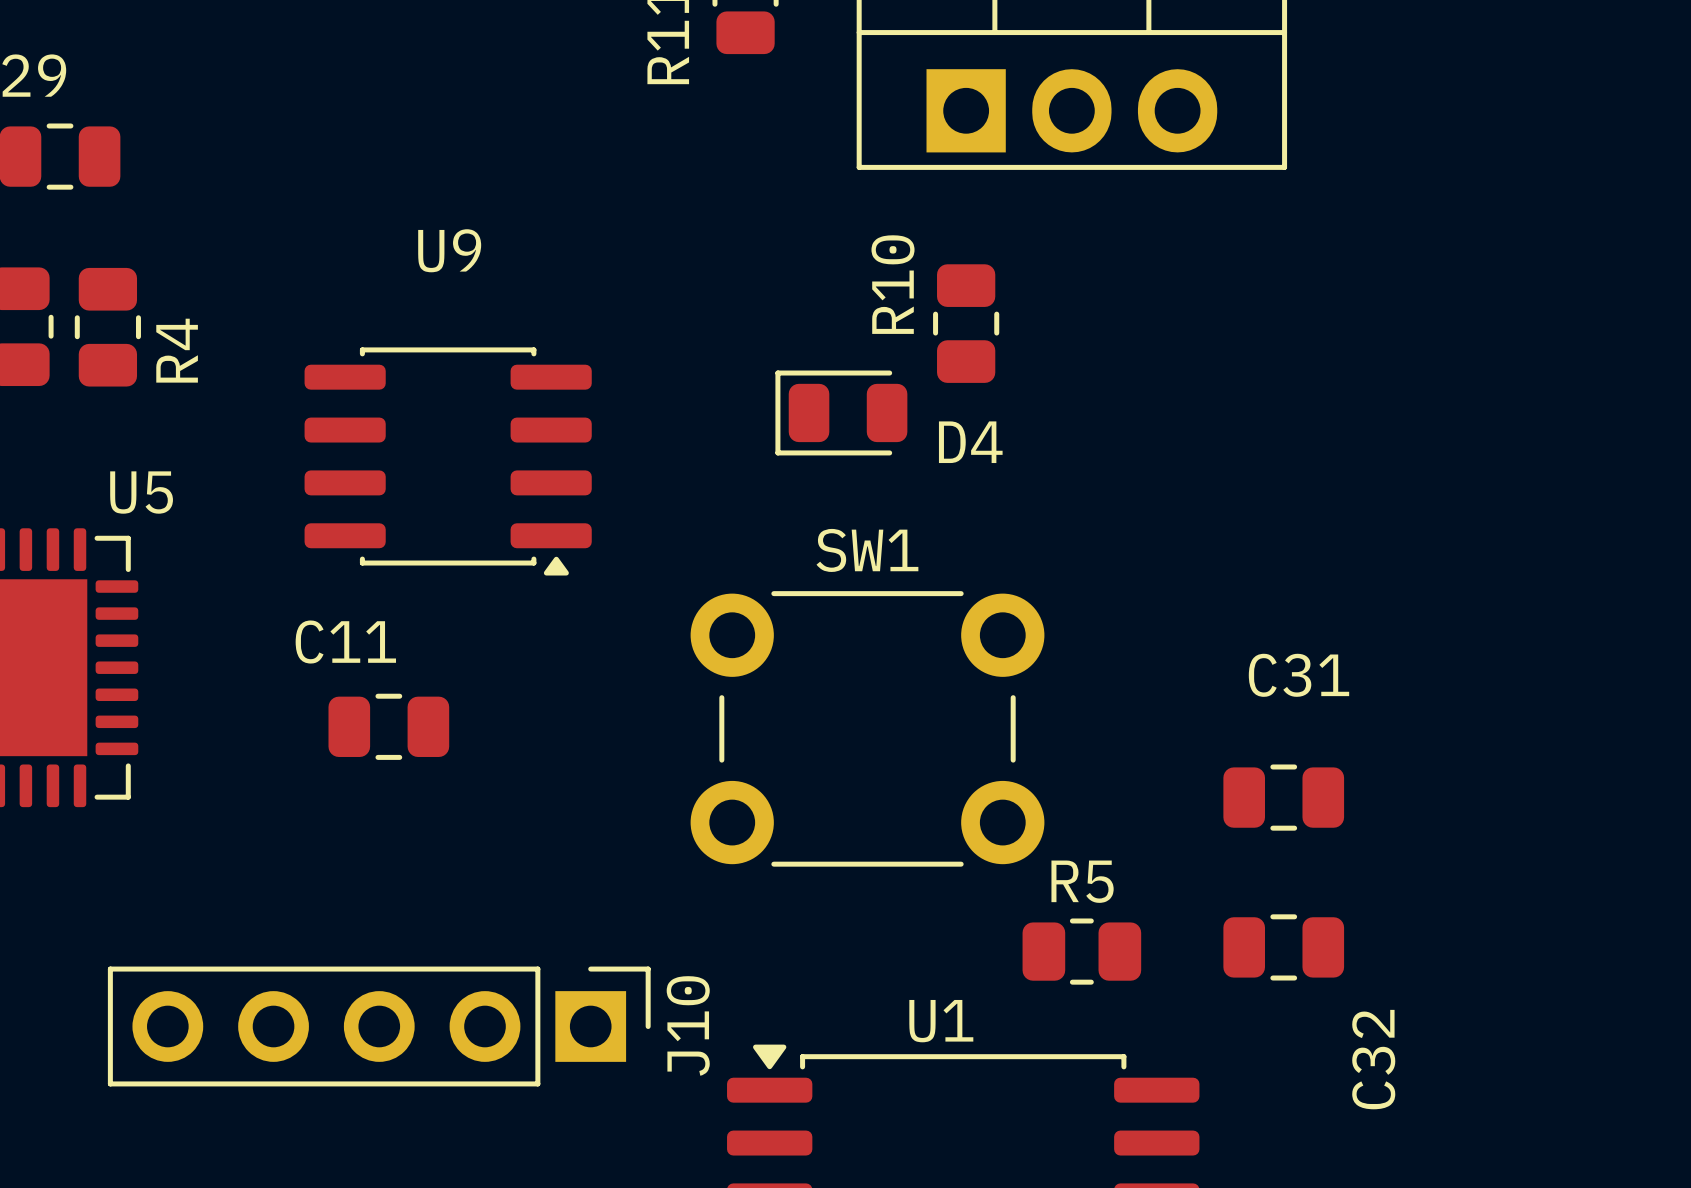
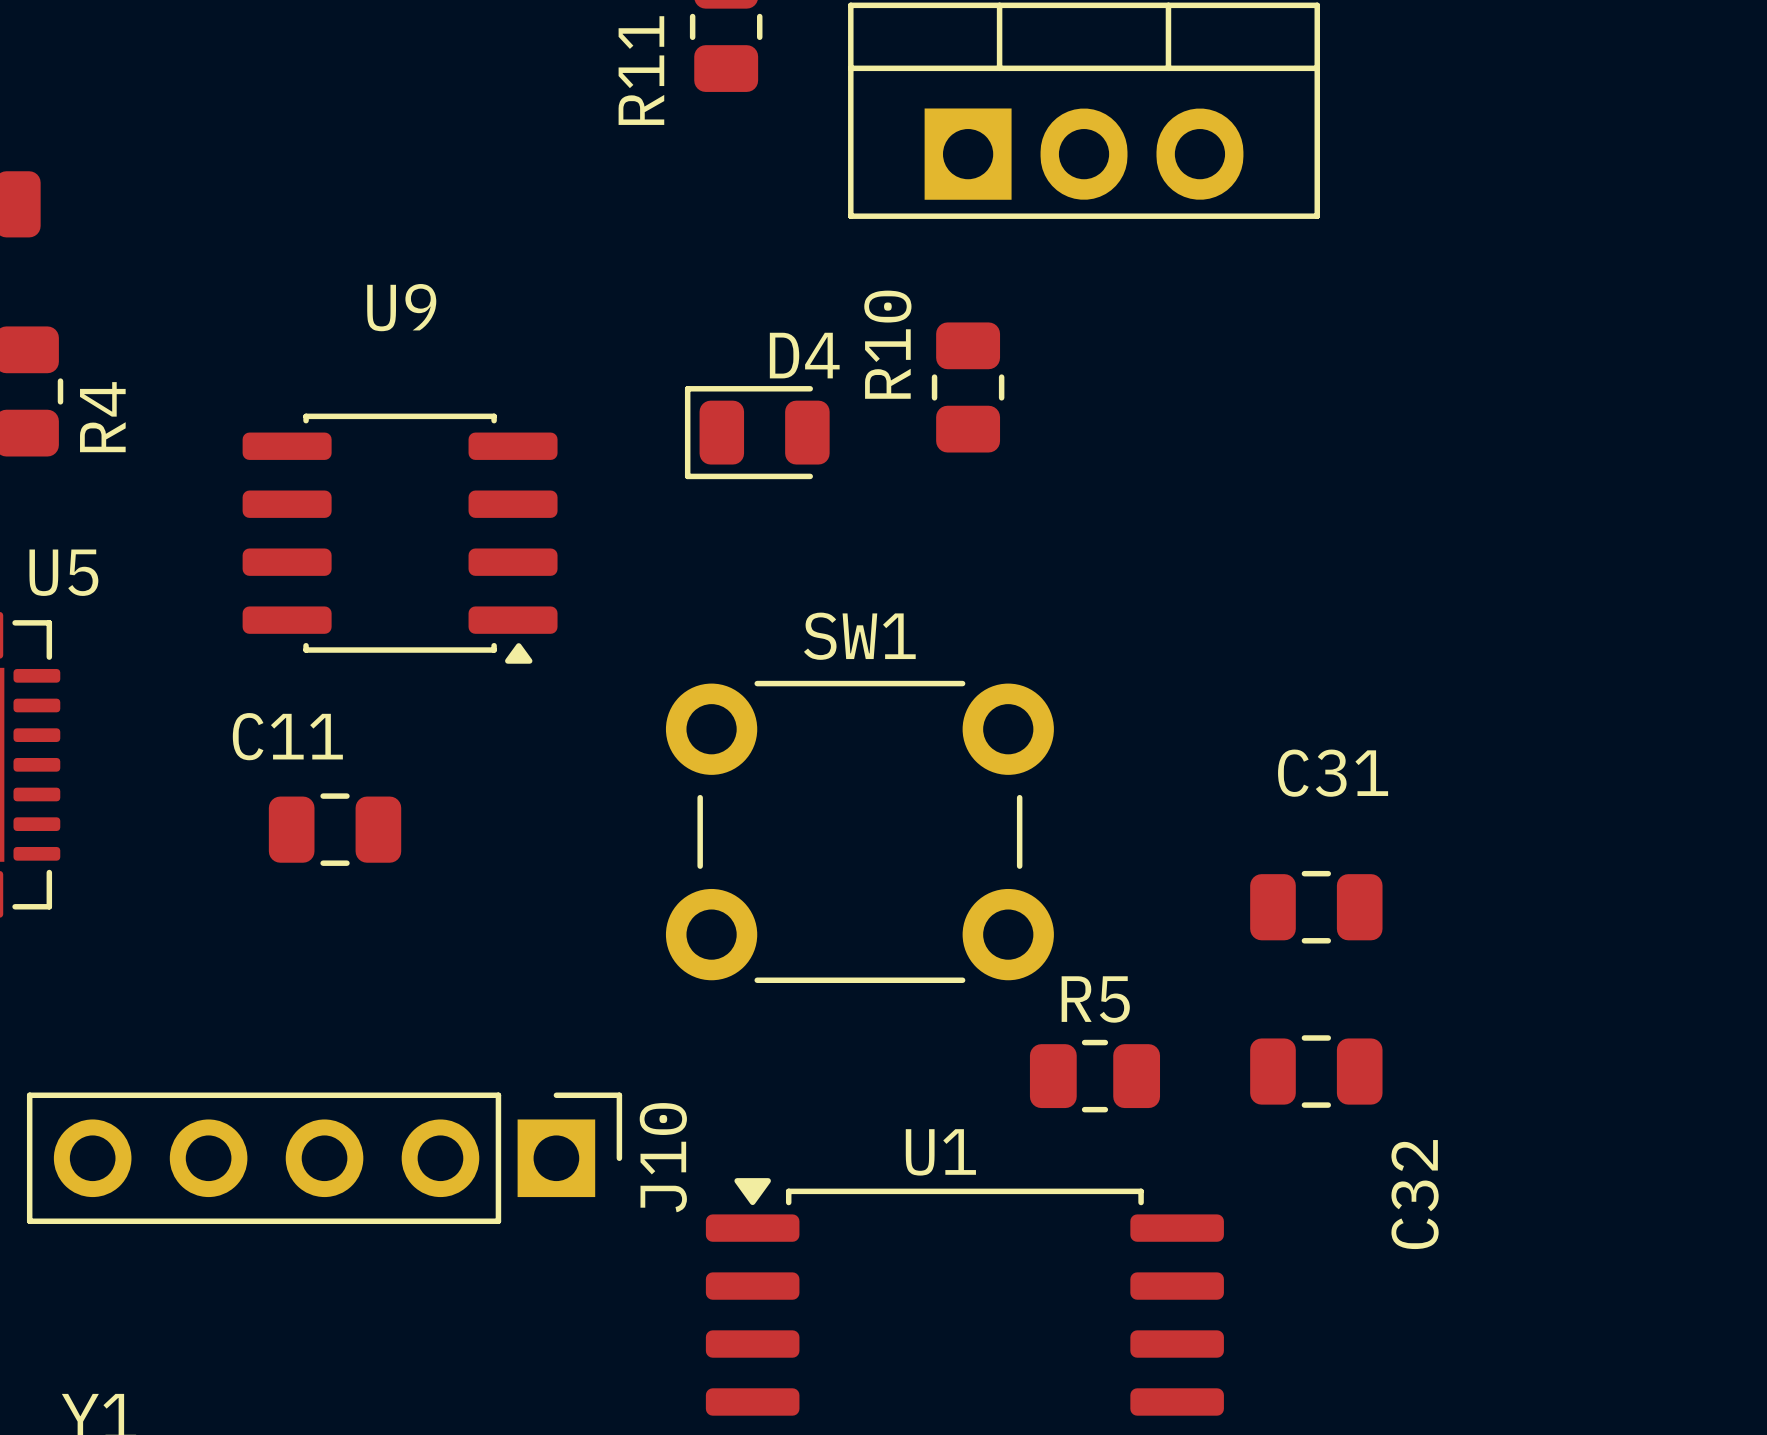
D4 position: (841, 412) -> (757, 432)
D4 name position: D4 (970, 442) -> D4 (804, 355)

